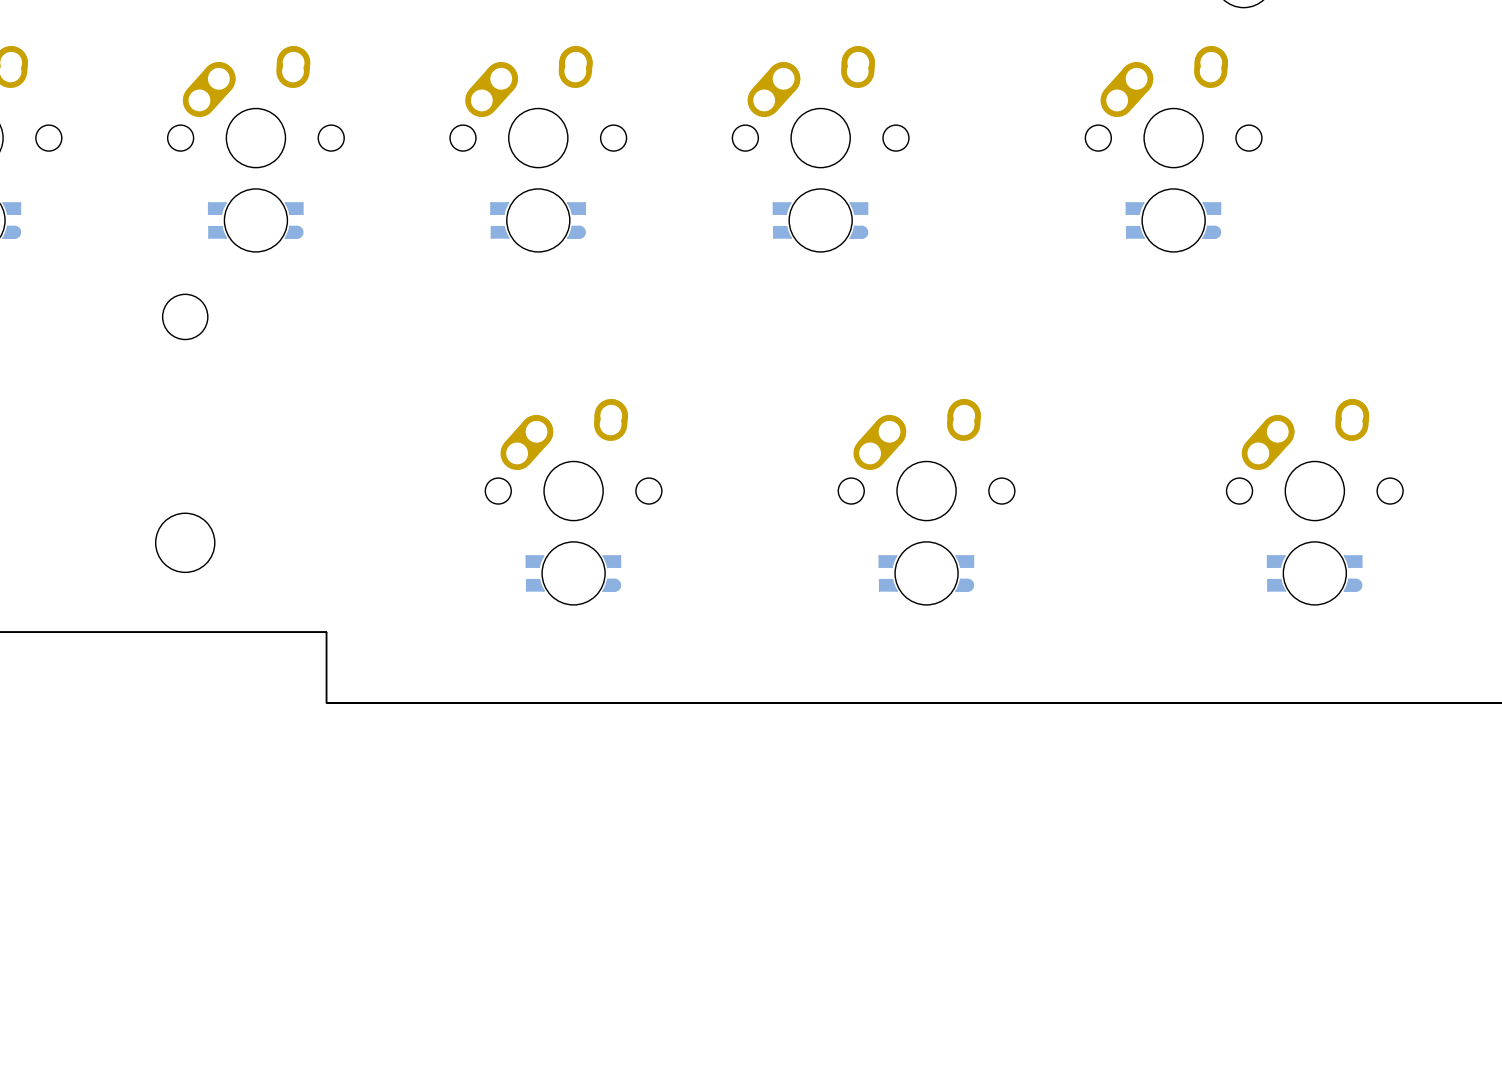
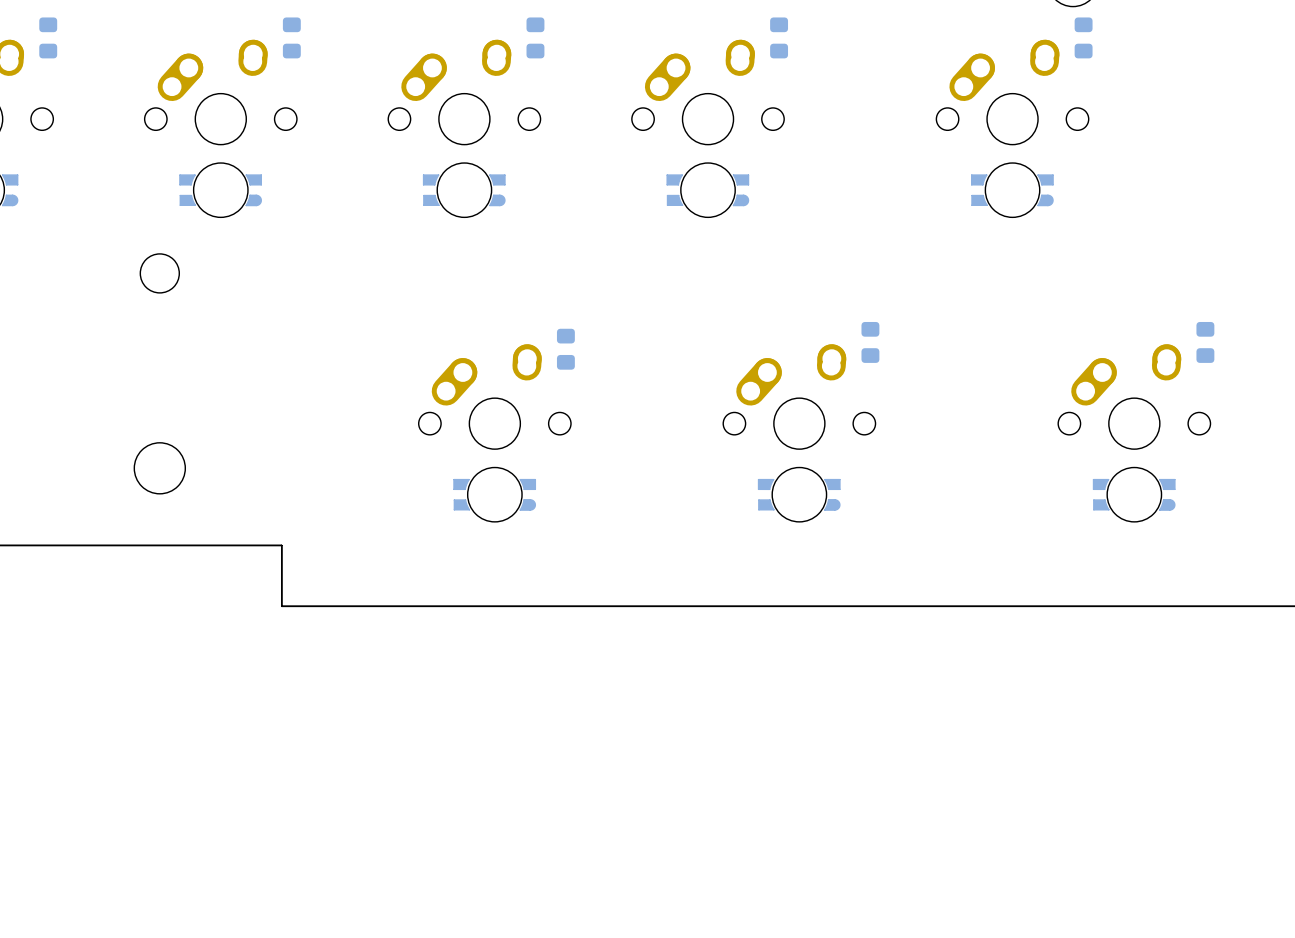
part: none -> (48, 37)
part: none -> (291, 37)
part: none -> (535, 37)
part: none -> (779, 37)
part: none -> (1083, 37)
part: none -> (870, 342)
part: none -> (1205, 342)
part: none -> (565, 349)

